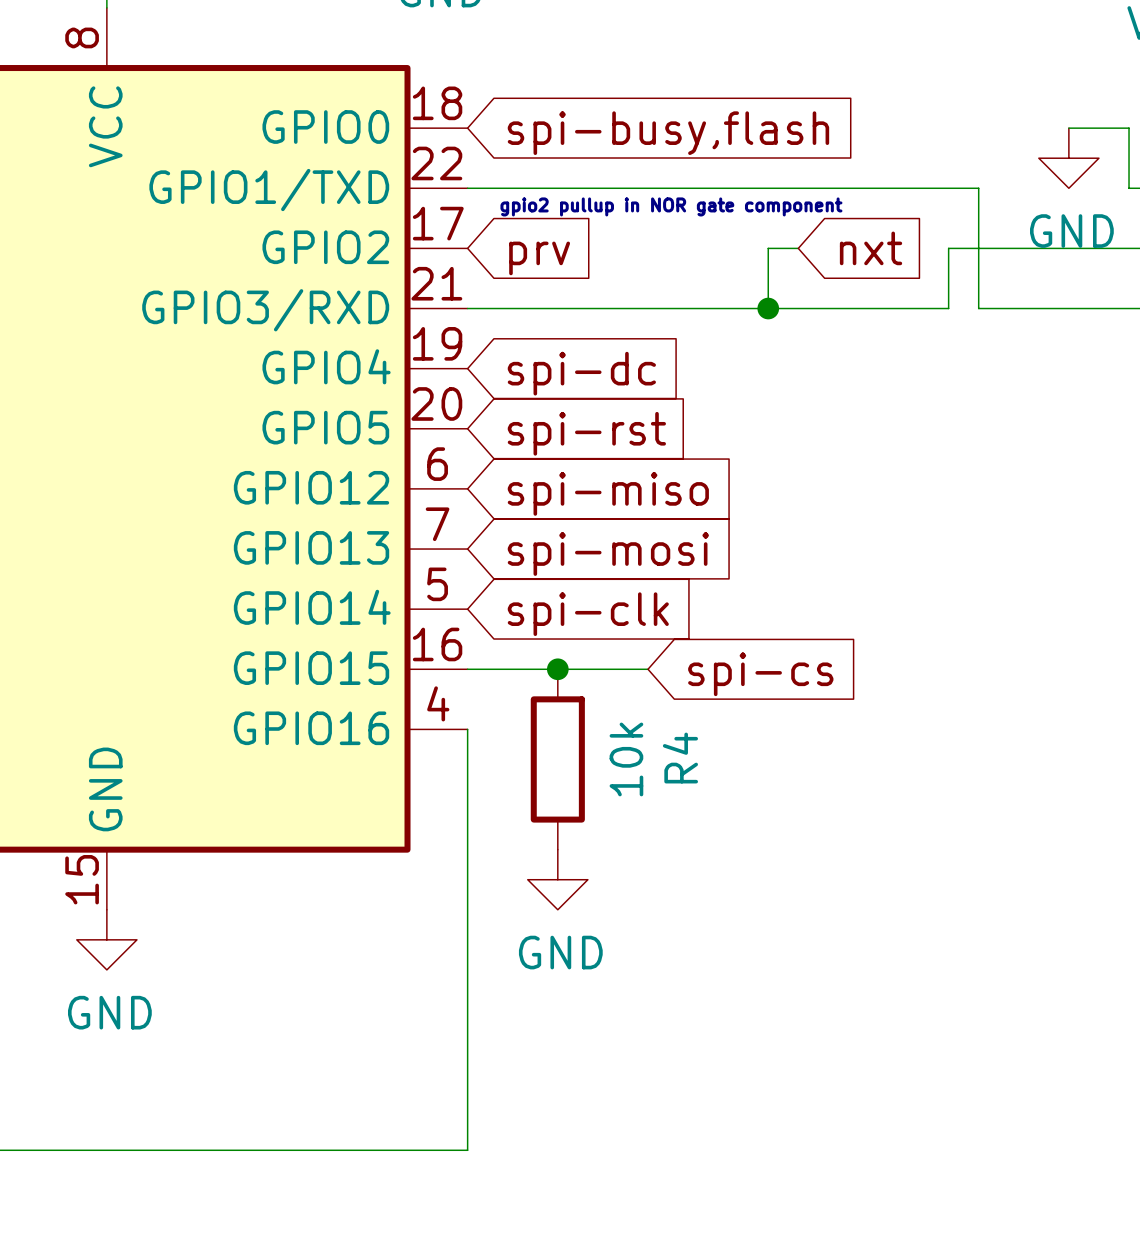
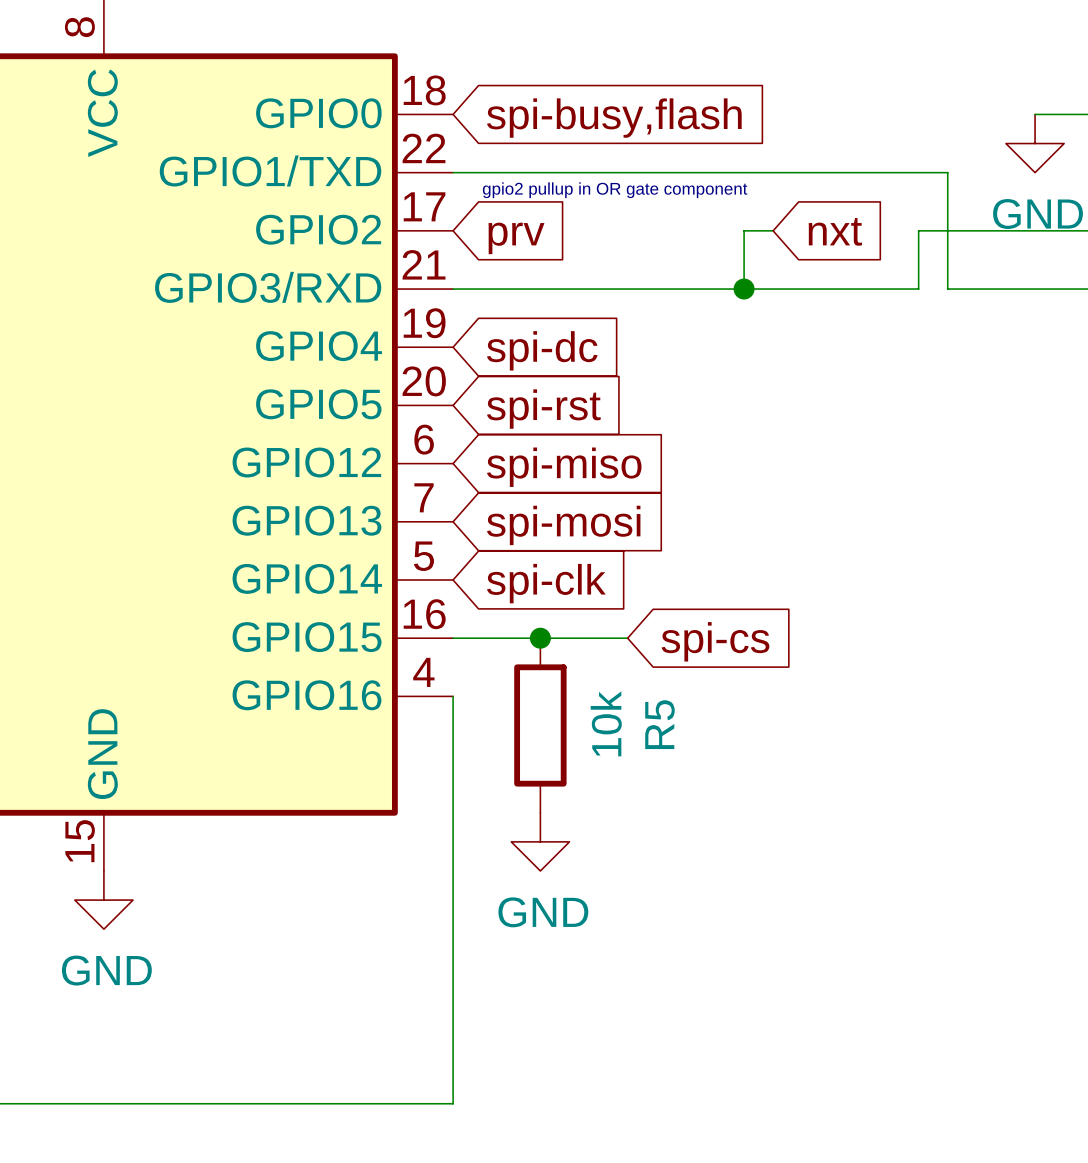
text: gpio2 pullup in NOR gate component (671, 206) -> gpio2 pullup in OR gate component (615, 190)
R4 name: R4 (680, 758) -> R5 (659, 724)

